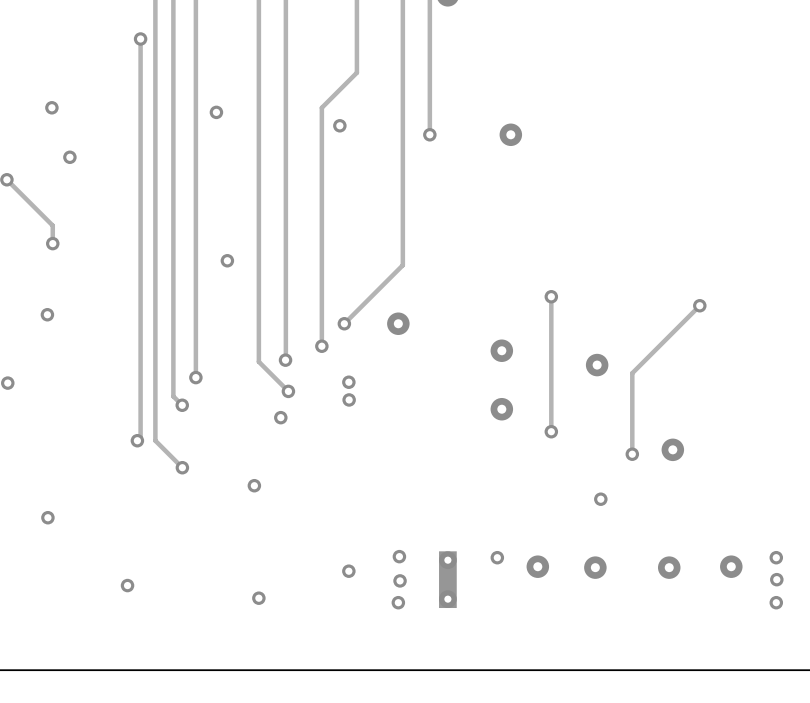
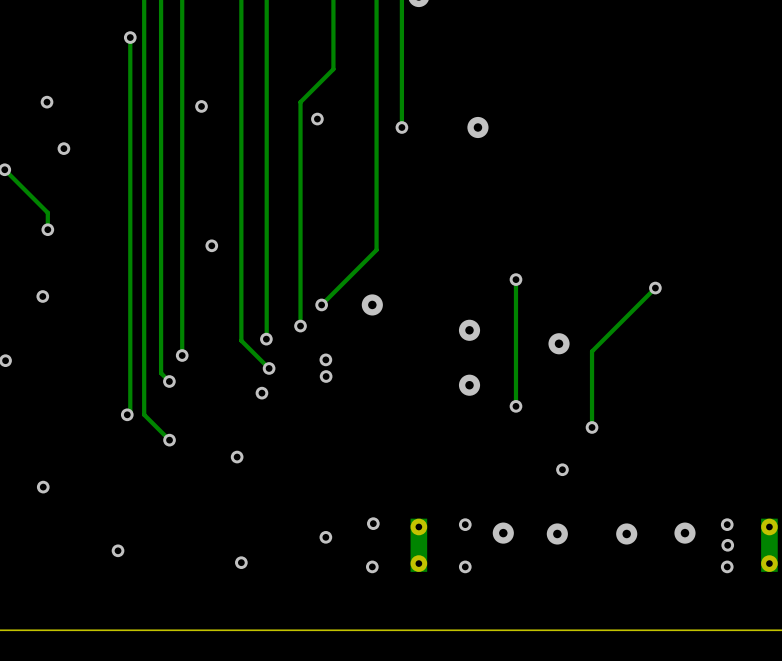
via: (672, 449) -> none
via position: (400, 580) -> (465, 566)

